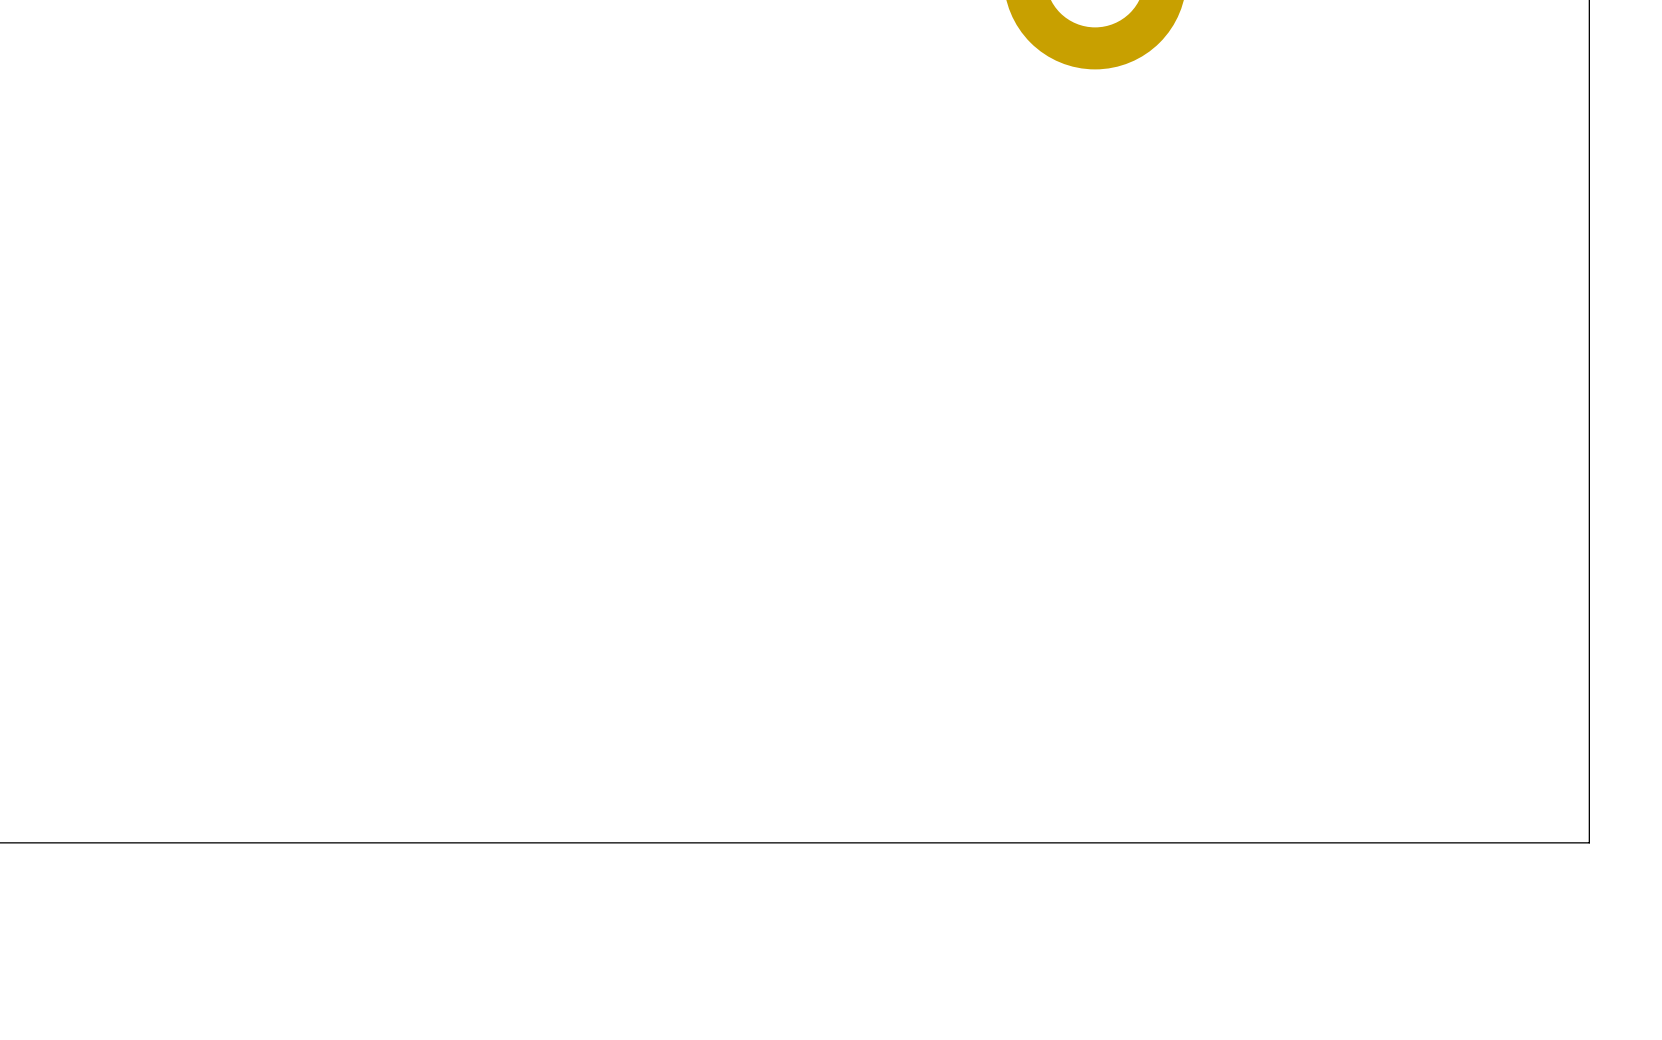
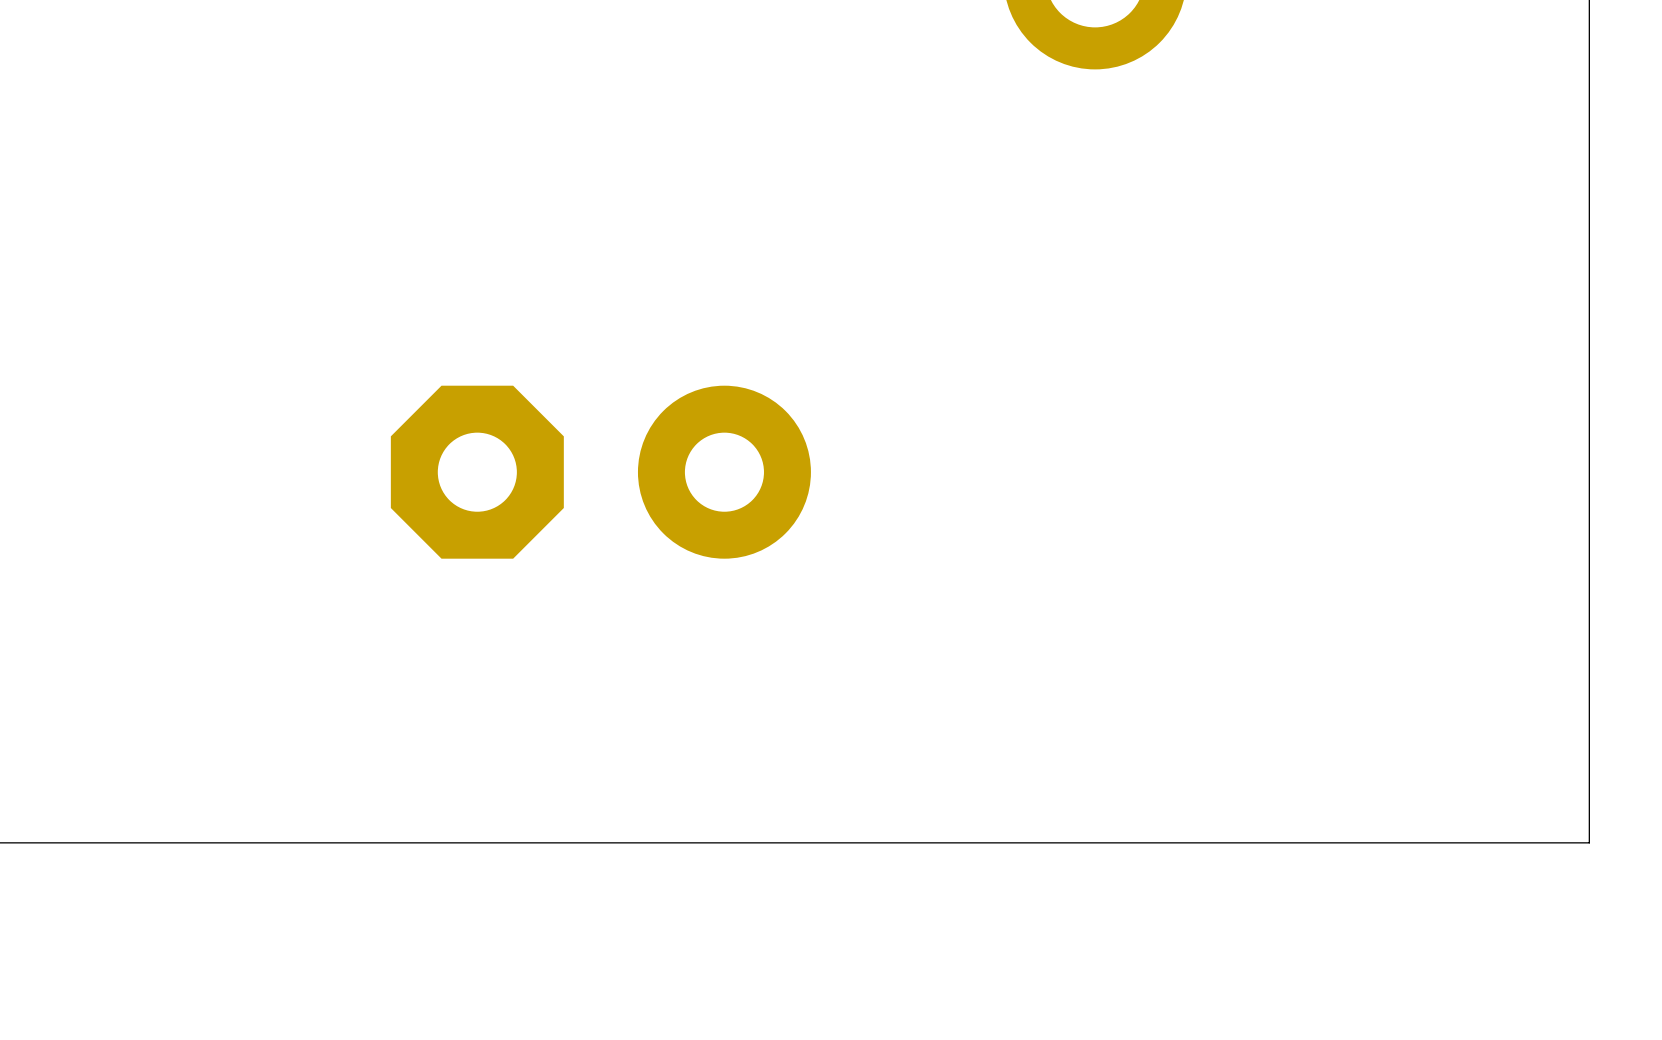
part: none -> (600, 472)

